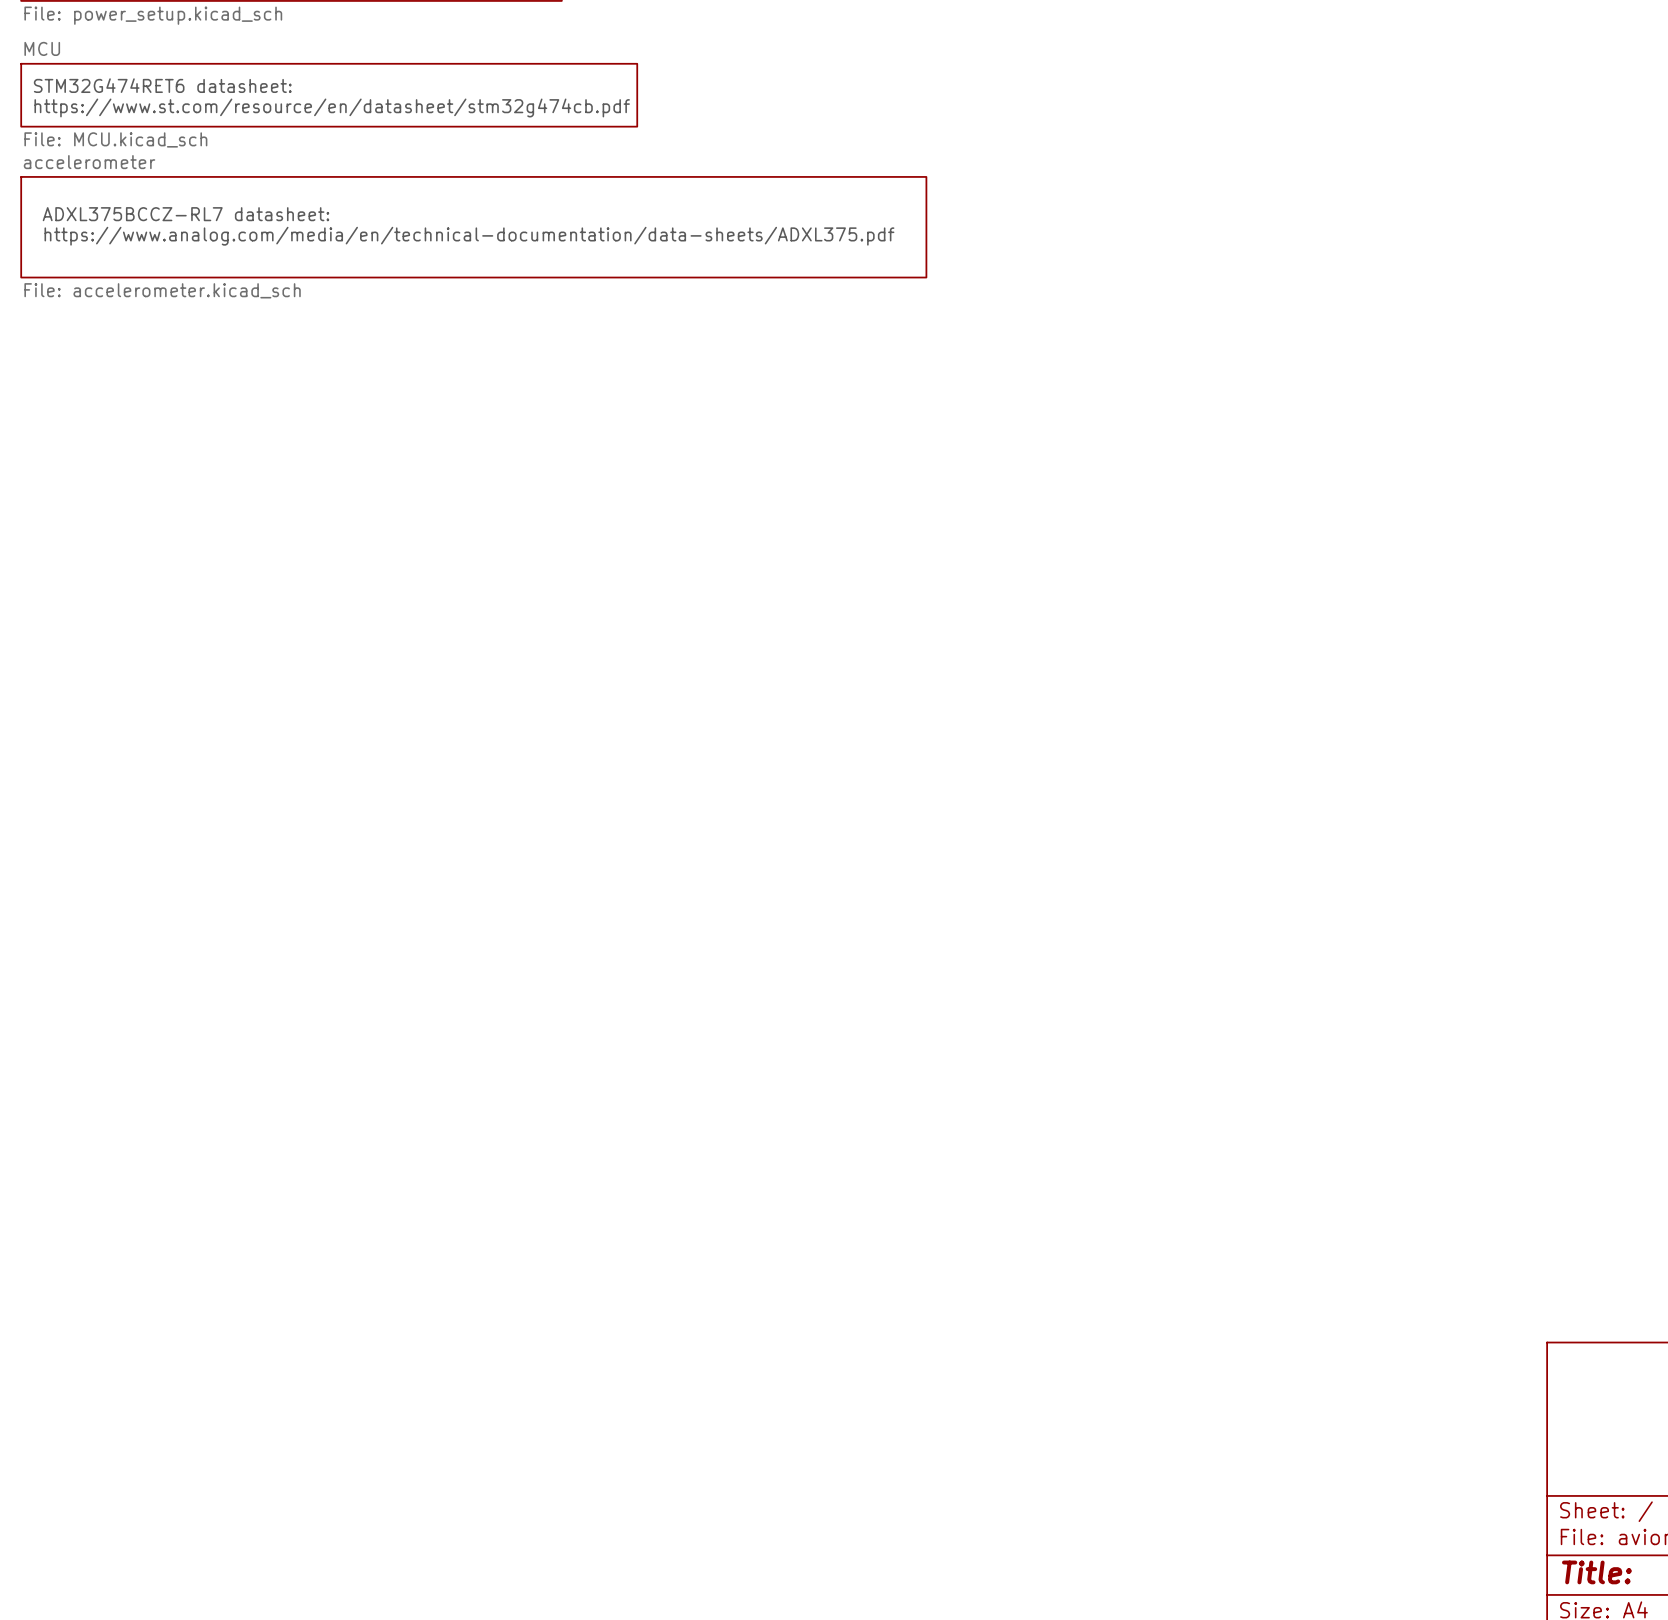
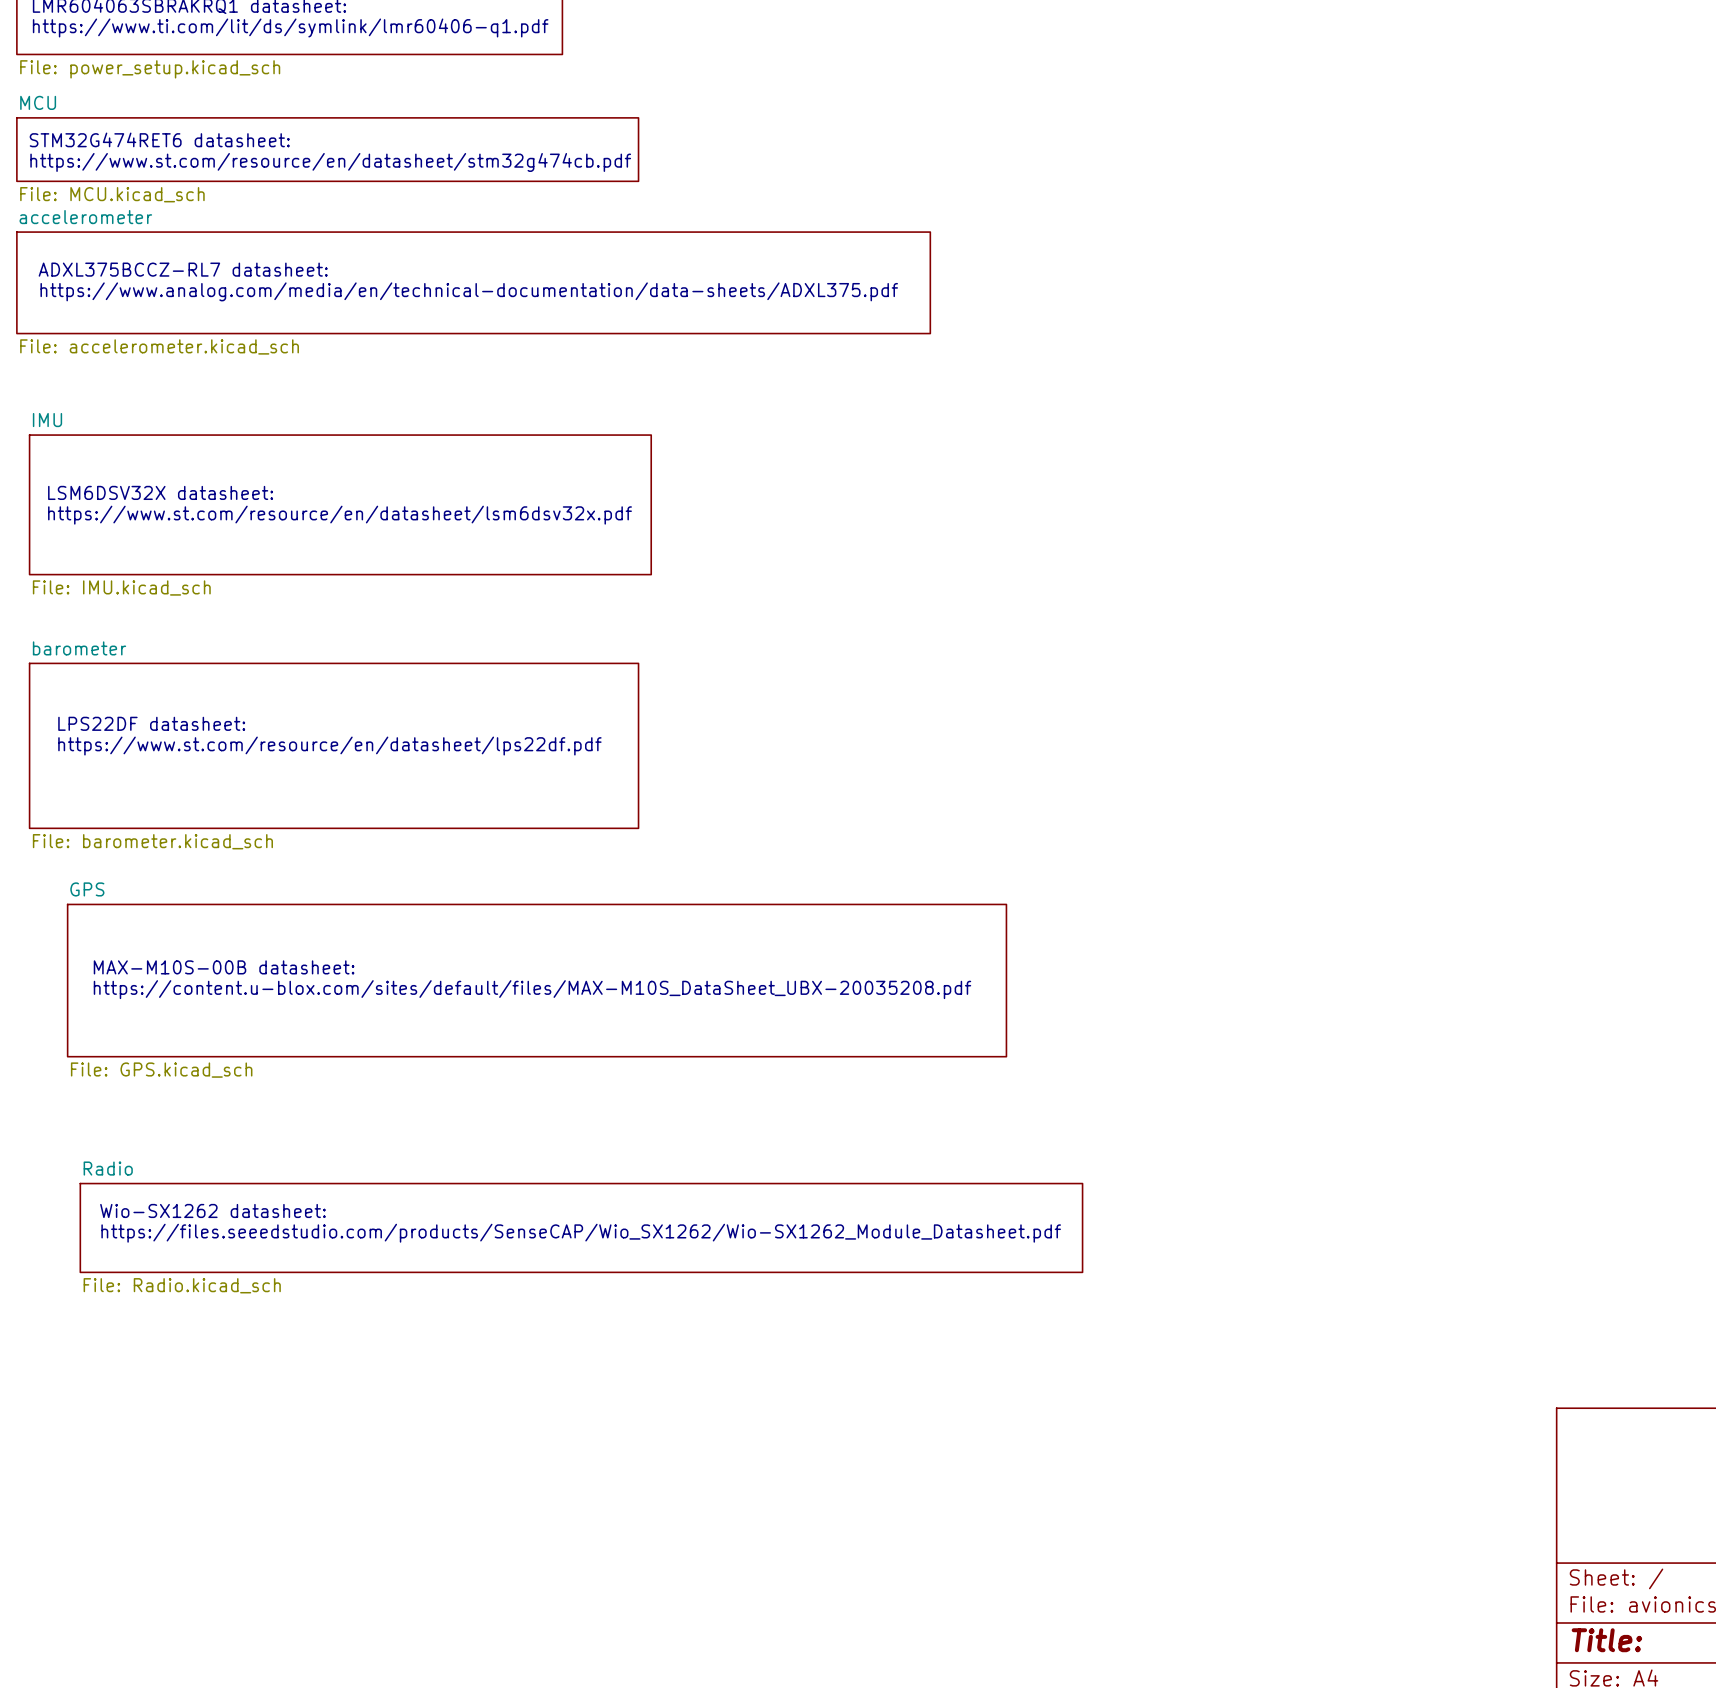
text: none -> LSM6DSV32X datasheet: (160, 492)
sheet IMU: none -> File: IMU.kicad_sch (340, 504)
text: none -> https://www.st.com/resource/en/datasheet/lsm6dsv32x.pdf (340, 515)
text: none -> LPS22DF datasheet: (151, 723)
text: none -> https://www.st.com/resource/en/datasheet/lps22df.pdf (329, 746)
sheet barometer: none -> File: barometer.kicad_sch (334, 745)
text: none -> MAX-M10S-00B datasheet: (224, 967)
sheet GPS: none -> File: GPS.kicad_sch (537, 980)
text: none -> https://content.u-blox.com/sites/default/files/MAX-M10S_DataSheet_UBX-20035208.pdf (532, 989)
text: none -> Wio-SX1262 datasheet: (212, 1210)
sheet Radio: none -> File: Radio.kicad_sch (581, 1227)
text: none -> https://files.seeedstudio.com/products/SenseCAP/Wio_SX1262/Wio-SX1262_Module_Datasheet.pdf (581, 1233)

